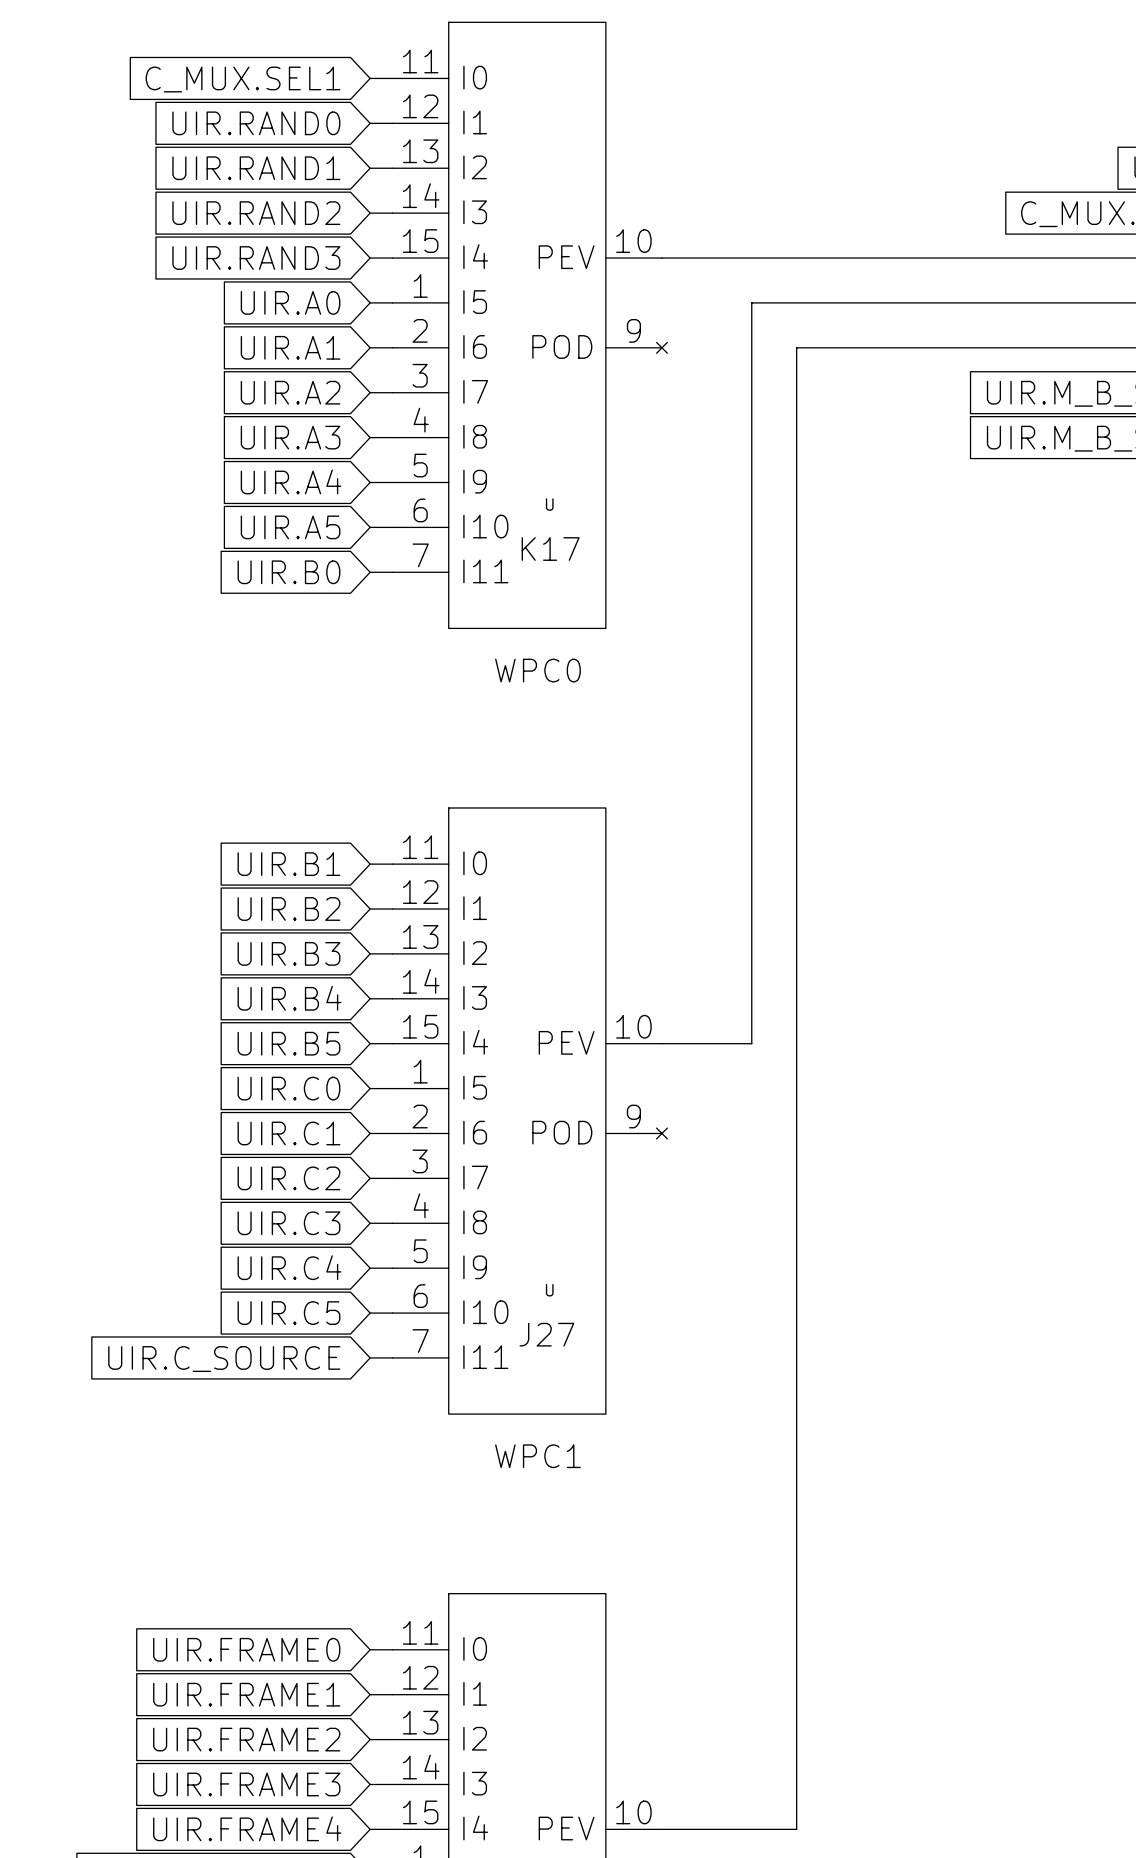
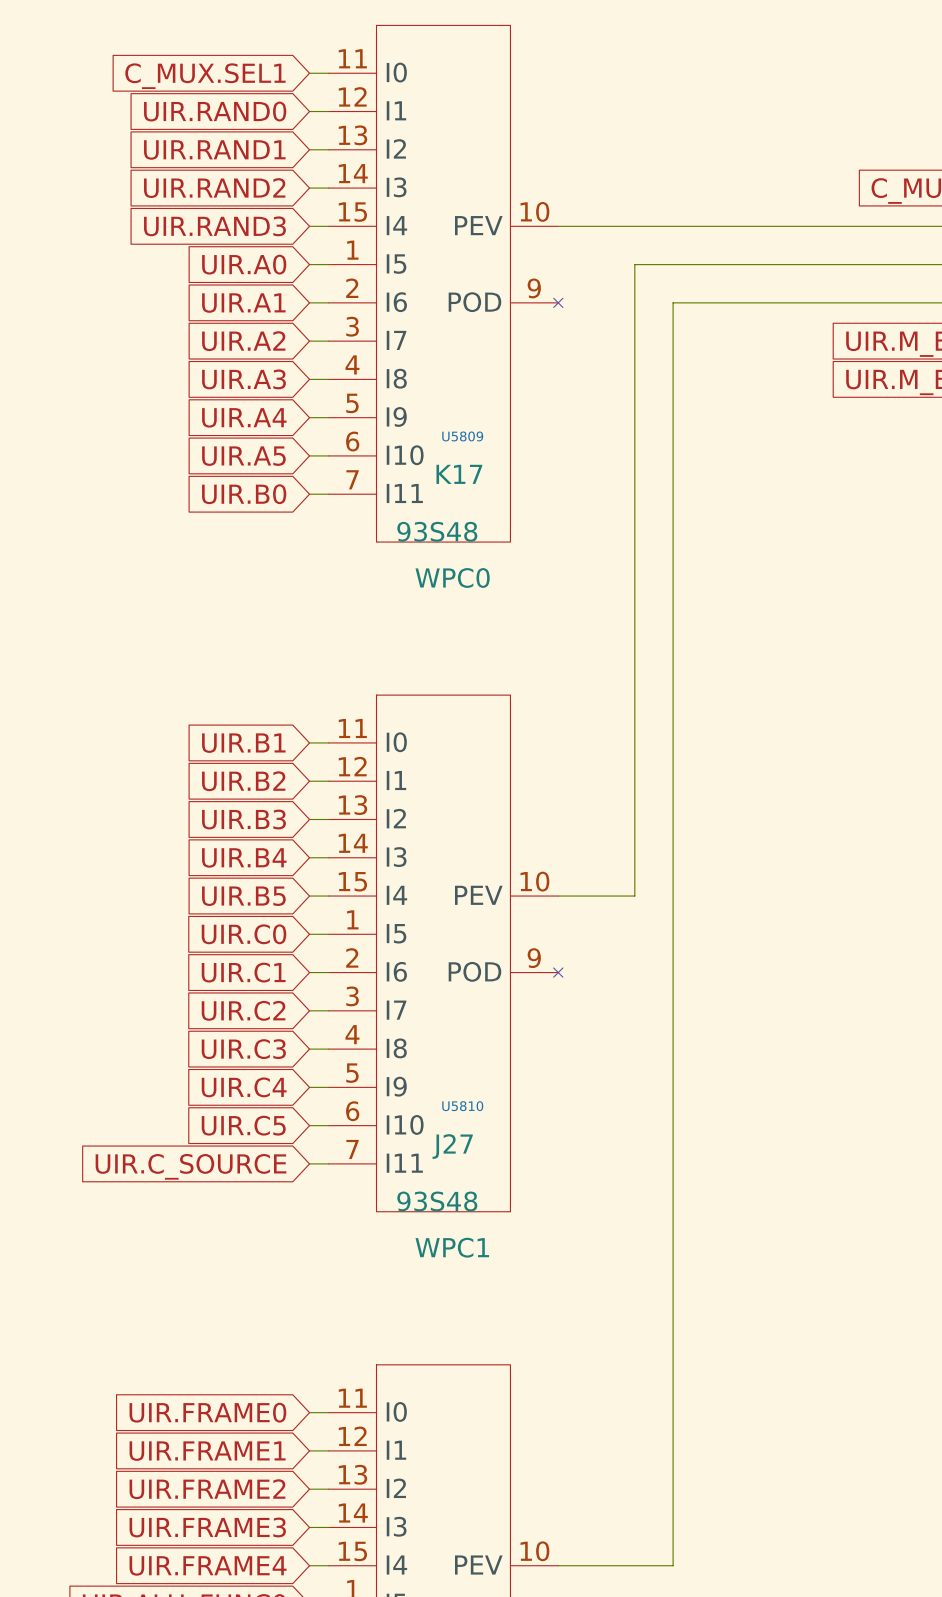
U name: U (549, 504) -> U5809 (462, 436)
U value: none -> 93S48 (437, 531)
U name: U (549, 1290) -> U5810 (462, 1106)
U value: none -> 93S48 (437, 1201)

